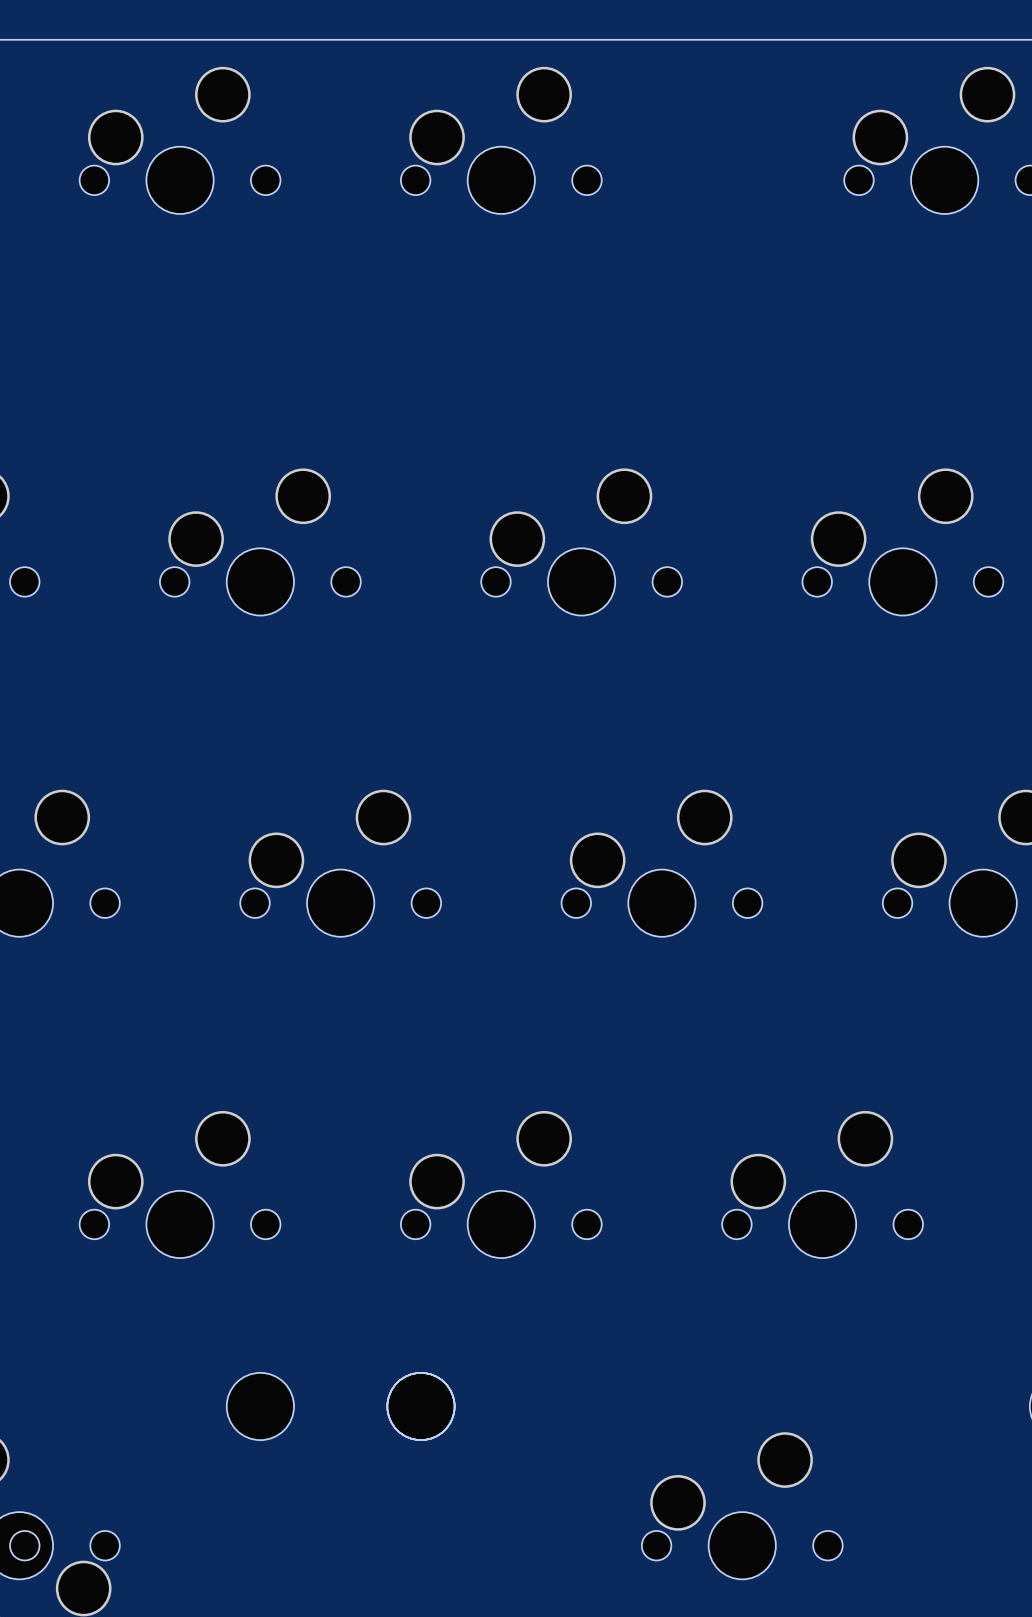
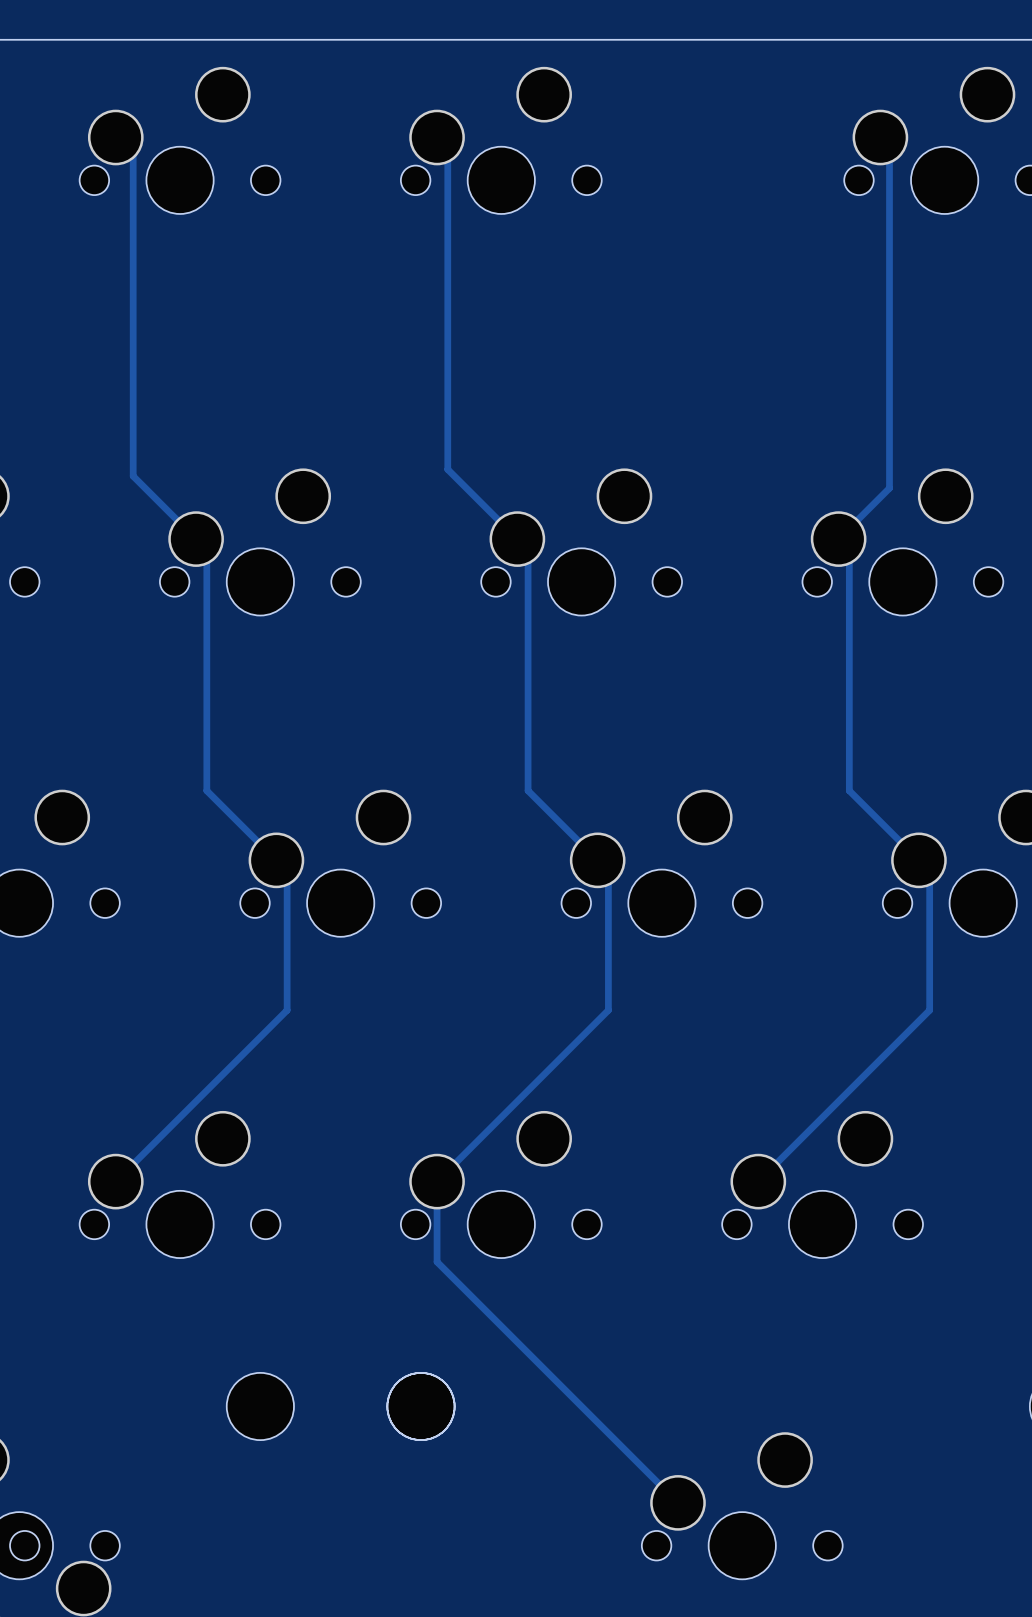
track: none -> (115, 137) (133, 154) (133, 476) (206, 549) (206, 790) (287, 871) (287, 1010) (115, 1181)
track: none -> (437, 137) (447, 148) (447, 469) (528, 549) (528, 790) (608, 871) (608, 1010) (437, 1181) (437, 1261) (678, 1502)
track: none -> (880, 137) (889, 146) (889, 488) (838, 539) (849, 549) (849, 790) (929, 871) (929, 1010) (758, 1181)

